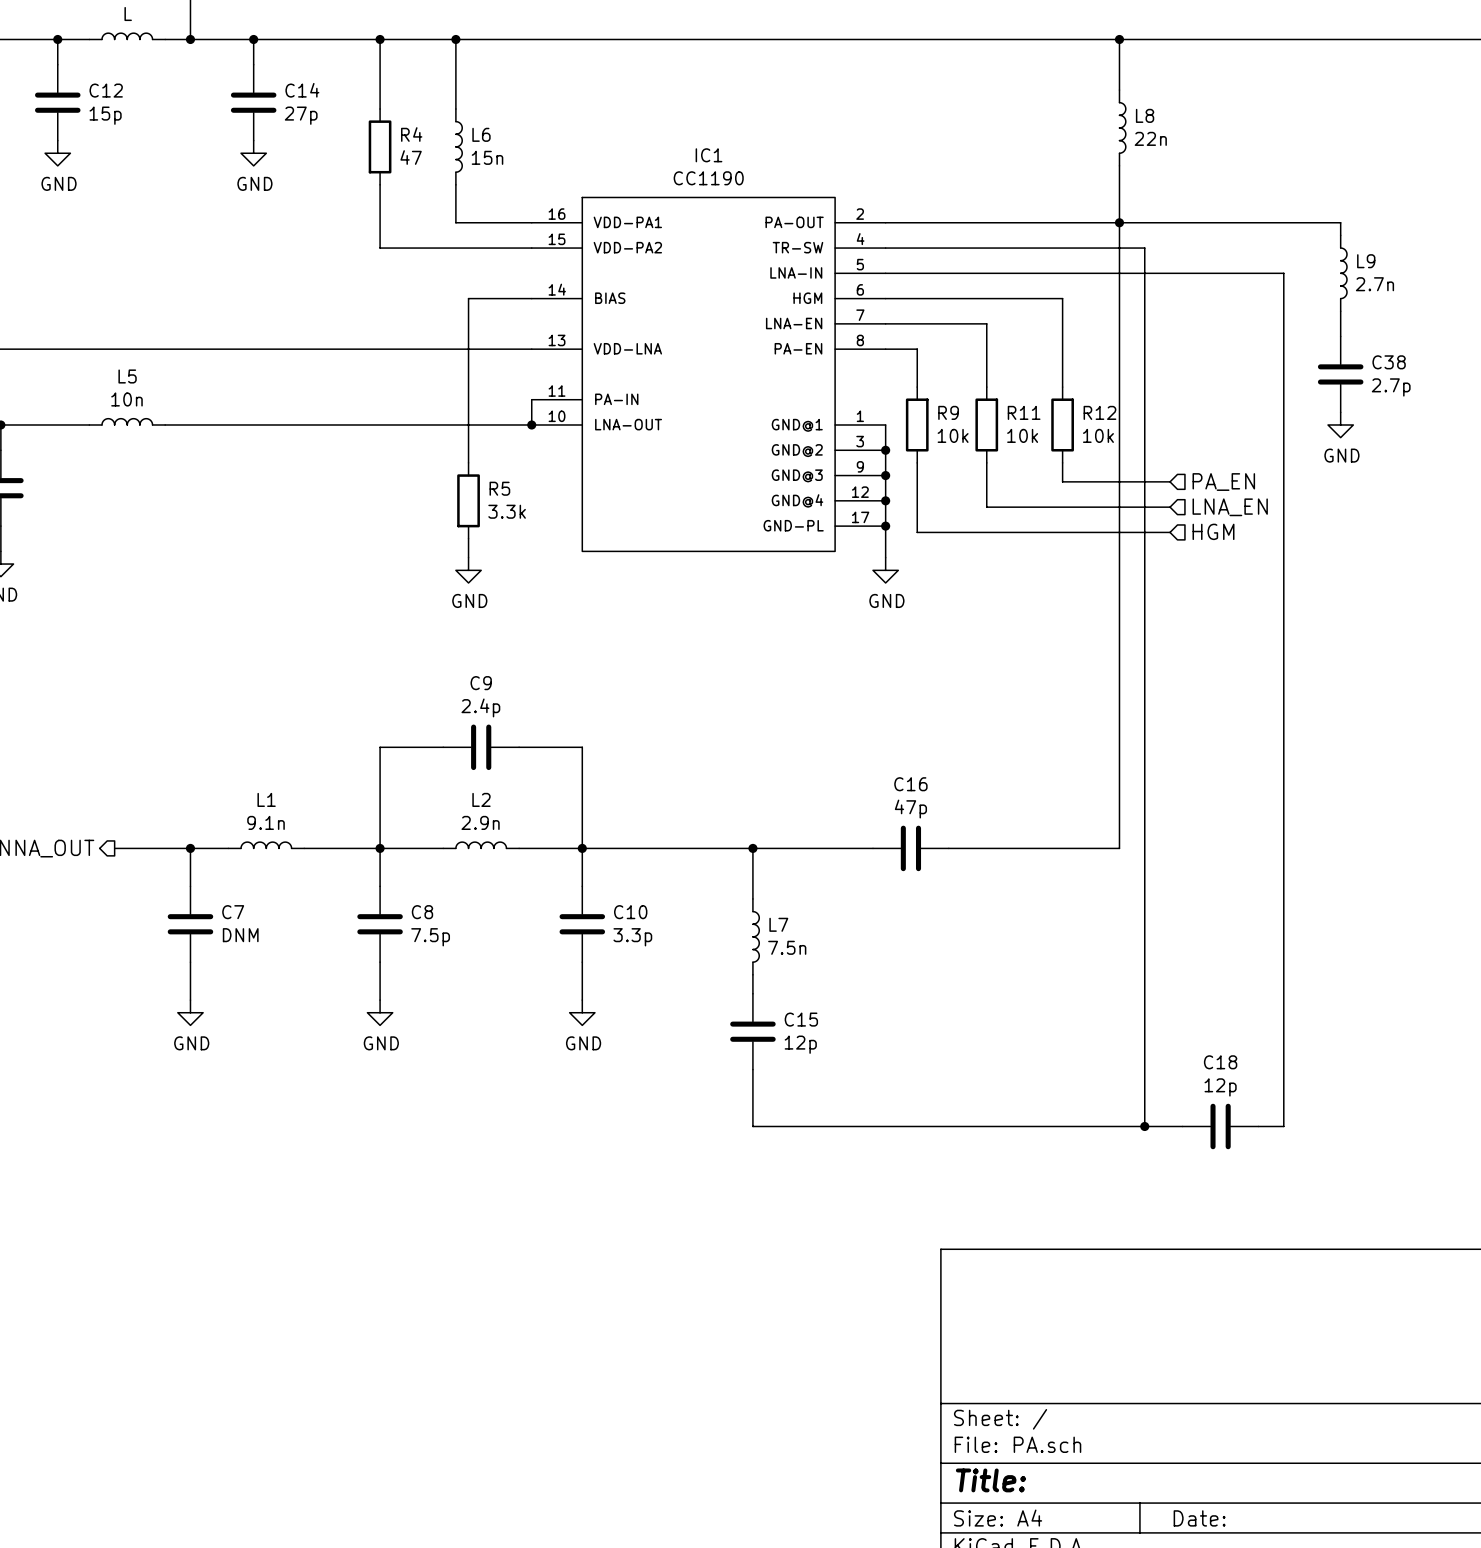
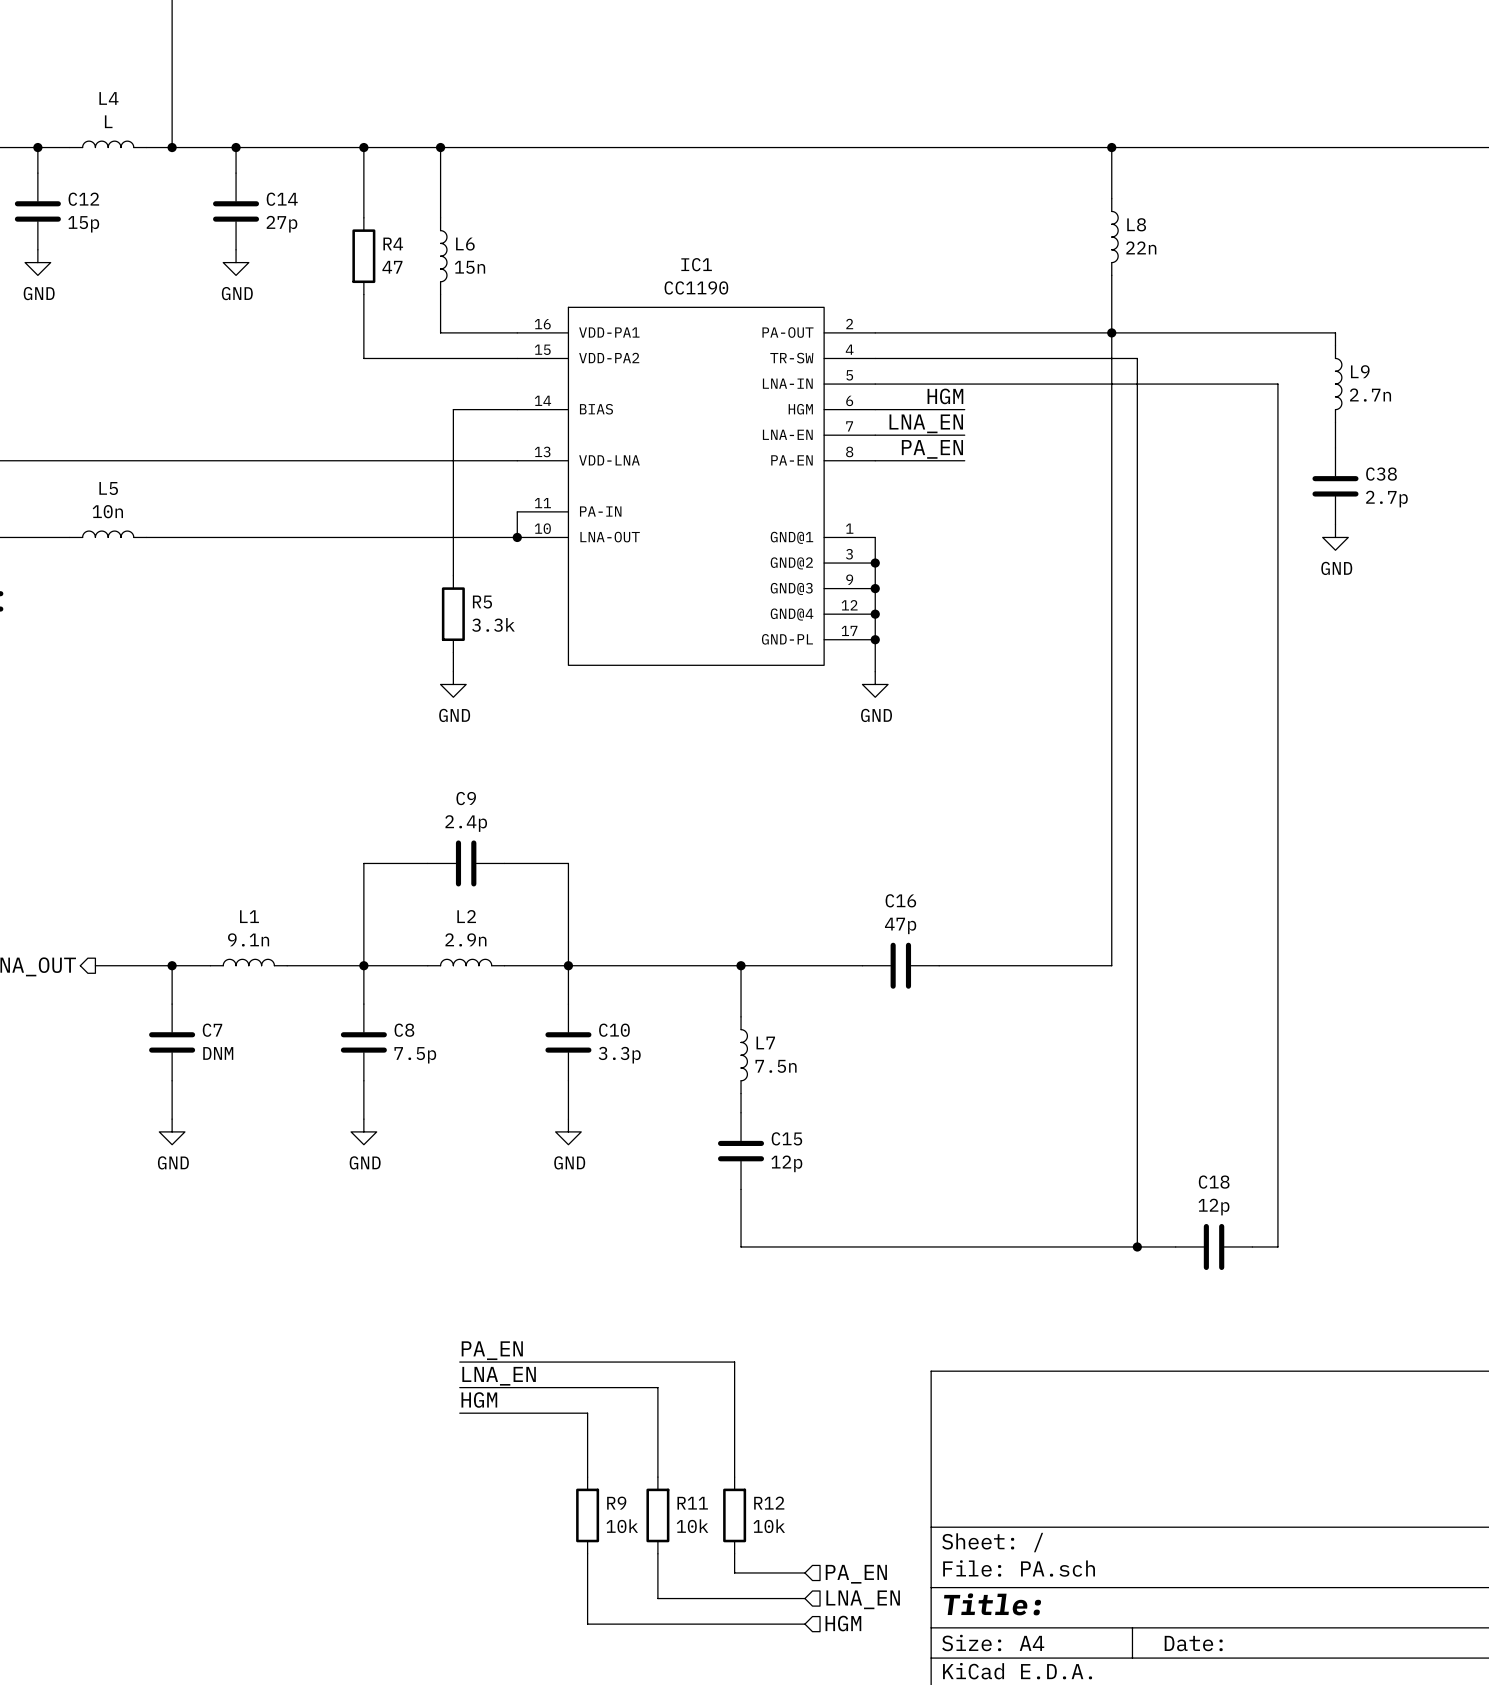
label: none -> HGM (945, 396)
wire: (974, 298) (1062, 298) (1062, 387) -> none
label: none -> LNA_EN (926, 423)
wire: (974, 323) (986, 323) (986, 387) -> none
label: none -> PA_EN (932, 449)
wire: (917, 349) (917, 387) -> (907, 460) (964, 460)
R9 position: (917, 424) -> (587, 1515)
R11 position: (986, 424) -> (657, 1515)
R12 position: (1062, 424) -> (734, 1515)
wire: (917, 462) (917, 532) (1170, 532) -> none
wire: (986, 462) (986, 507) (1170, 507) -> none
wire: (1062, 462) (1062, 481) (1170, 481) -> none
hierarchical label: PA_EN (1223, 482) -> none
hierarchical label: LNA_EN (1230, 507) -> none
hierarchical label: HGM (1213, 531) -> none
label: none -> PA_EN (492, 1350)
wire: none -> (459, 1362) (734, 1362) (734, 1477)
label: none -> LNA_EN (499, 1376)
wire: none -> (459, 1387) (657, 1387) (657, 1477)
label: none -> HGM (479, 1399)
wire: none -> (459, 1413) (587, 1413) (587, 1477)
wire: none -> (587, 1553) (587, 1624) (804, 1624)
wire: none -> (657, 1553) (657, 1598) (804, 1598)
wire: none -> (734, 1553) (734, 1572) (804, 1572)
hierarchical label: none -> PA_EN (856, 1574)
hierarchical label: none -> LNA_EN (863, 1599)
hierarchical label: none -> HGM (843, 1623)

